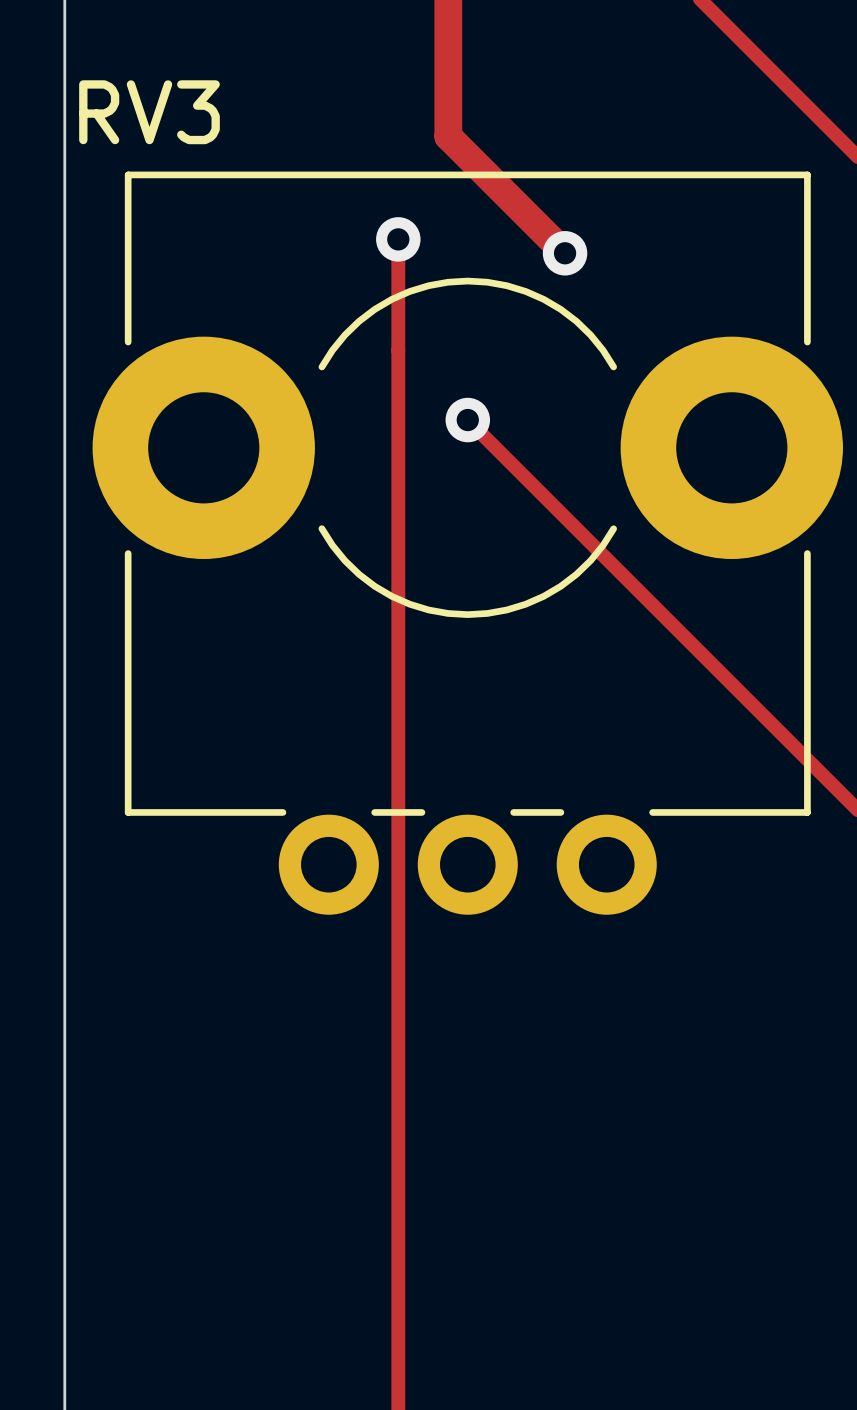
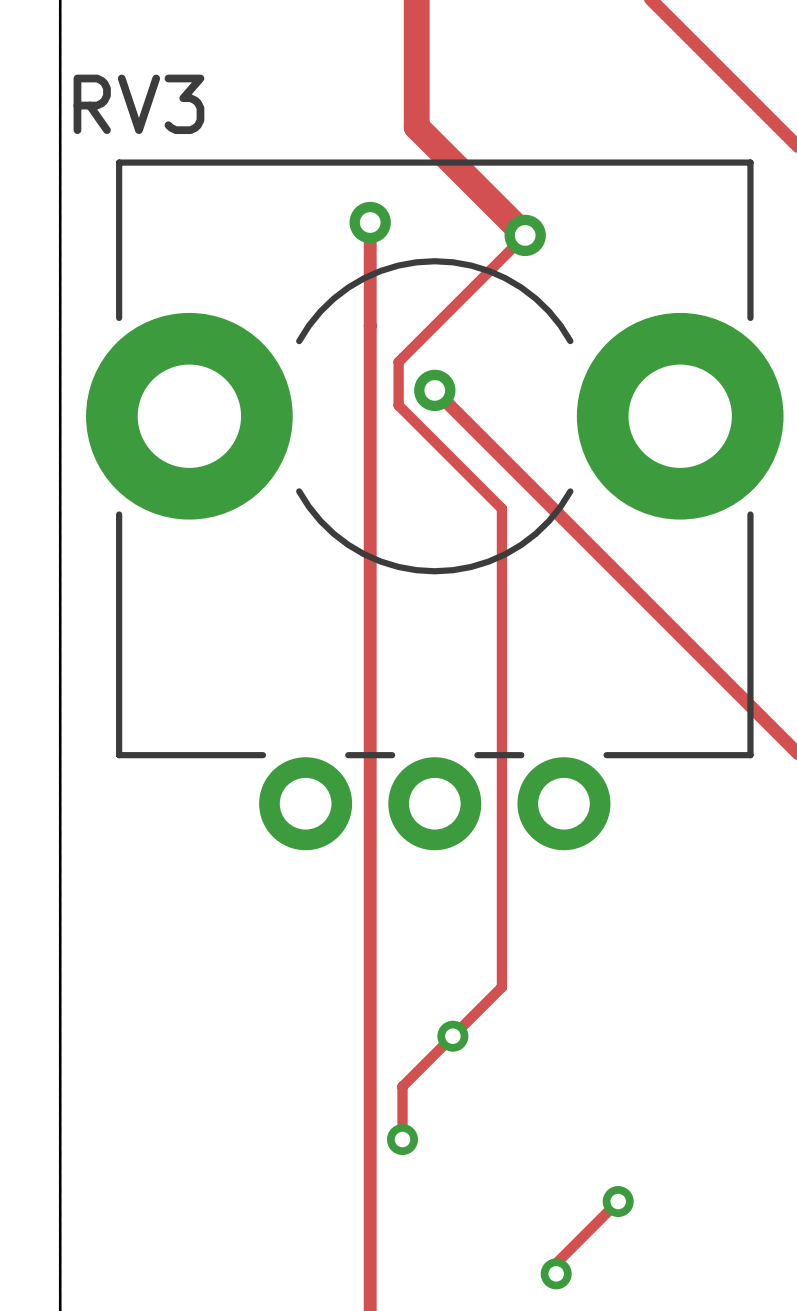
track: none -> (525, 235) (398, 361) (398, 405) (501, 508) (501, 987) (402, 1086) (402, 1139)
via: none -> (452, 1036)
via: none -> (402, 1139)
track: none -> (618, 1201) (556, 1263) (556, 1273)
via: none -> (618, 1201)
via: none -> (556, 1273)

